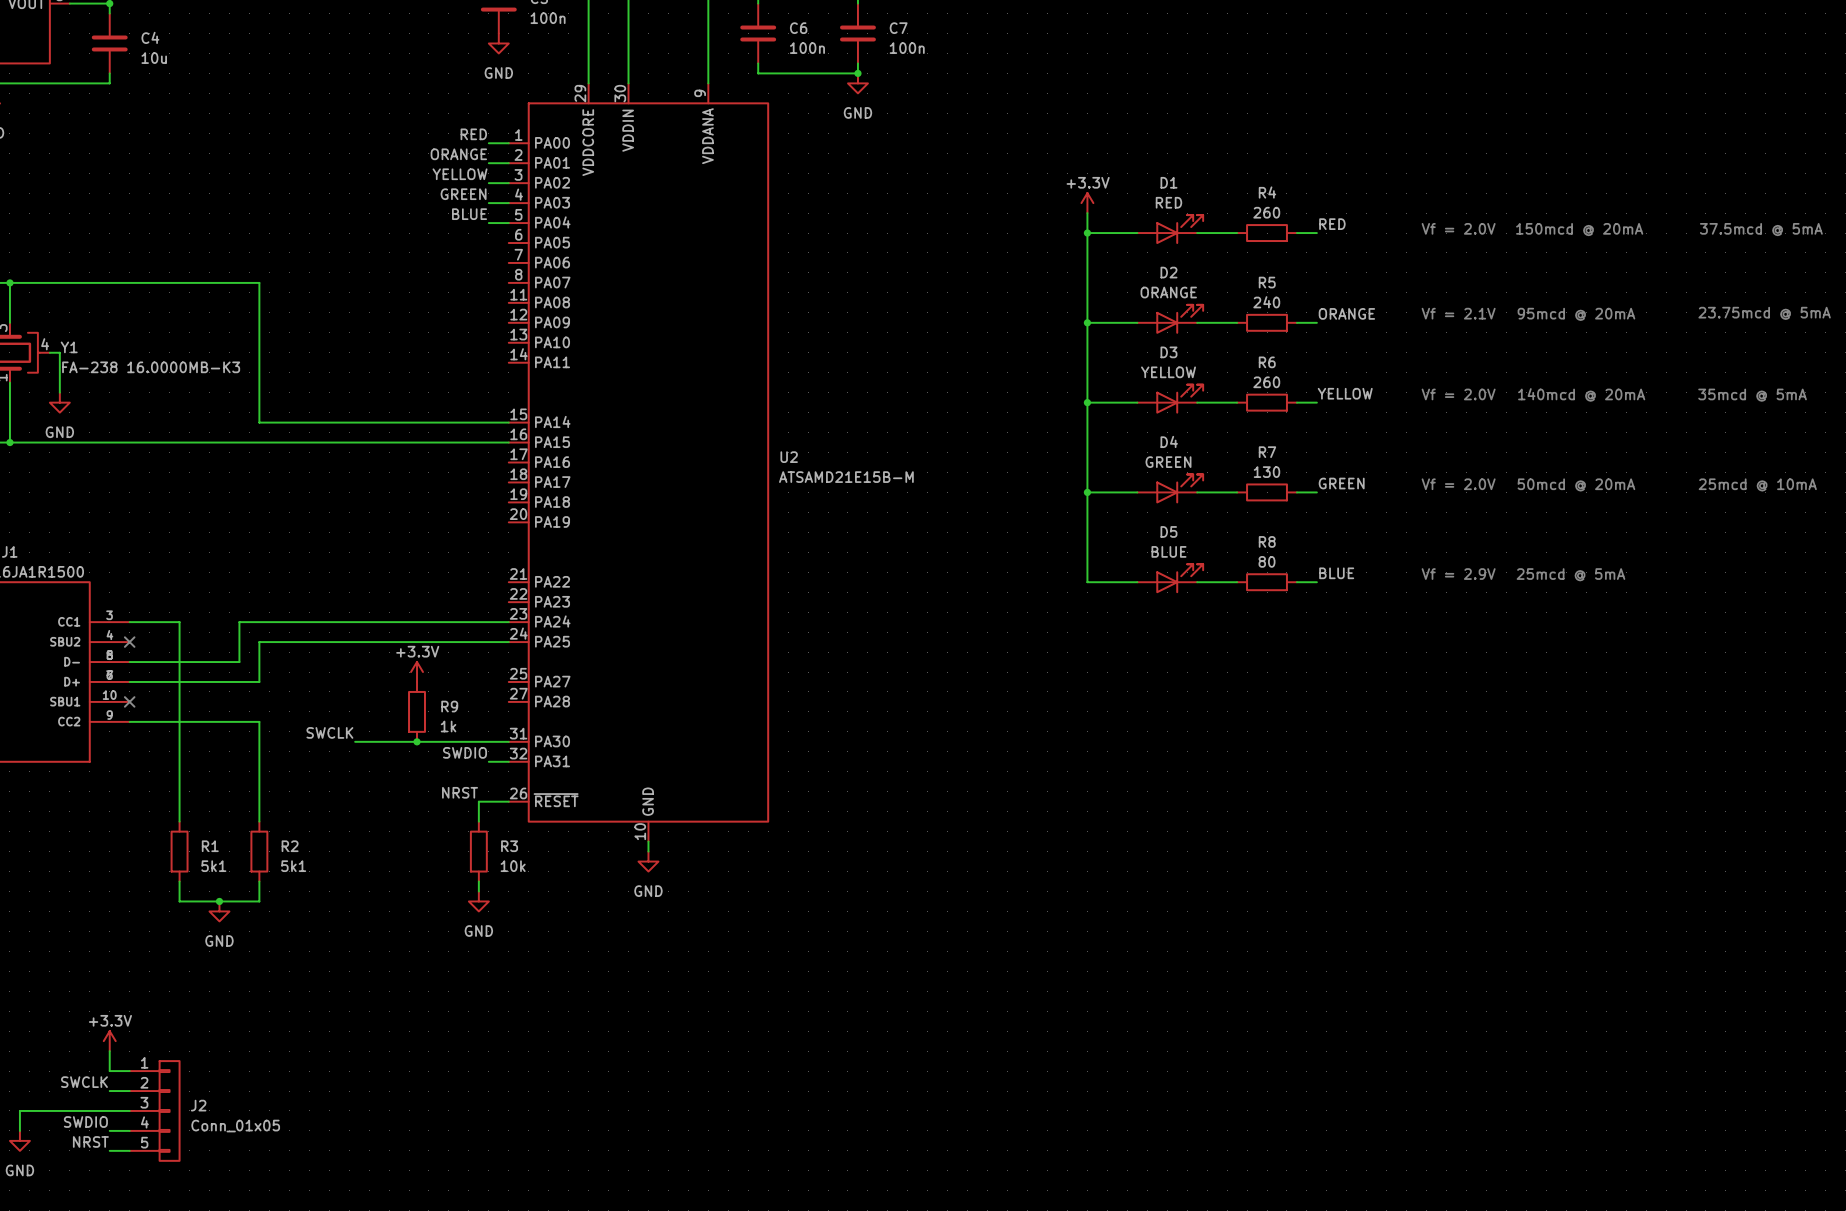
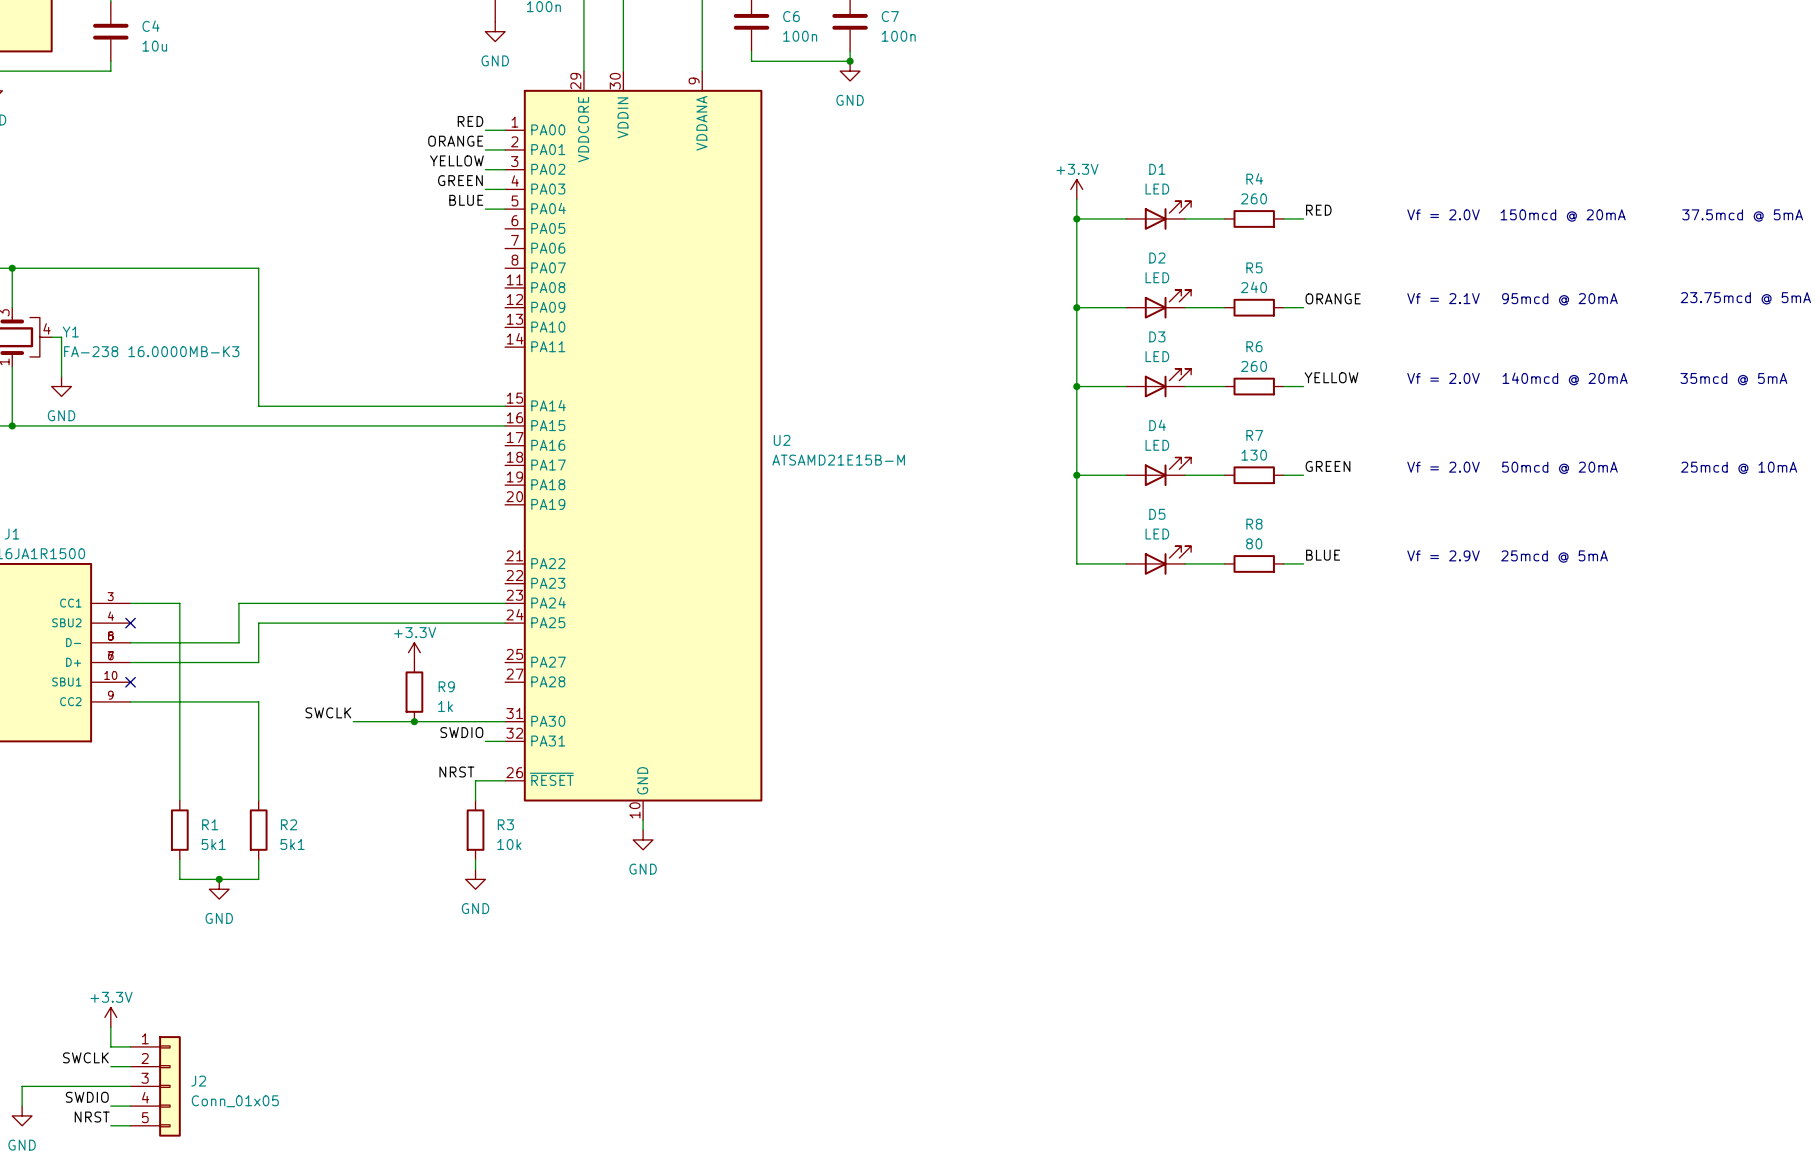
D1 value: RED (1168, 202) -> LED (1157, 189)
D2 value: ORANGE (1168, 292) -> LED (1157, 277)
D3 value: YELLOW (1168, 372) -> LED (1157, 356)
D4 value: GREEN (1168, 462) -> LED (1157, 445)
D5 value: BLUE (1168, 551) -> LED (1157, 534)

